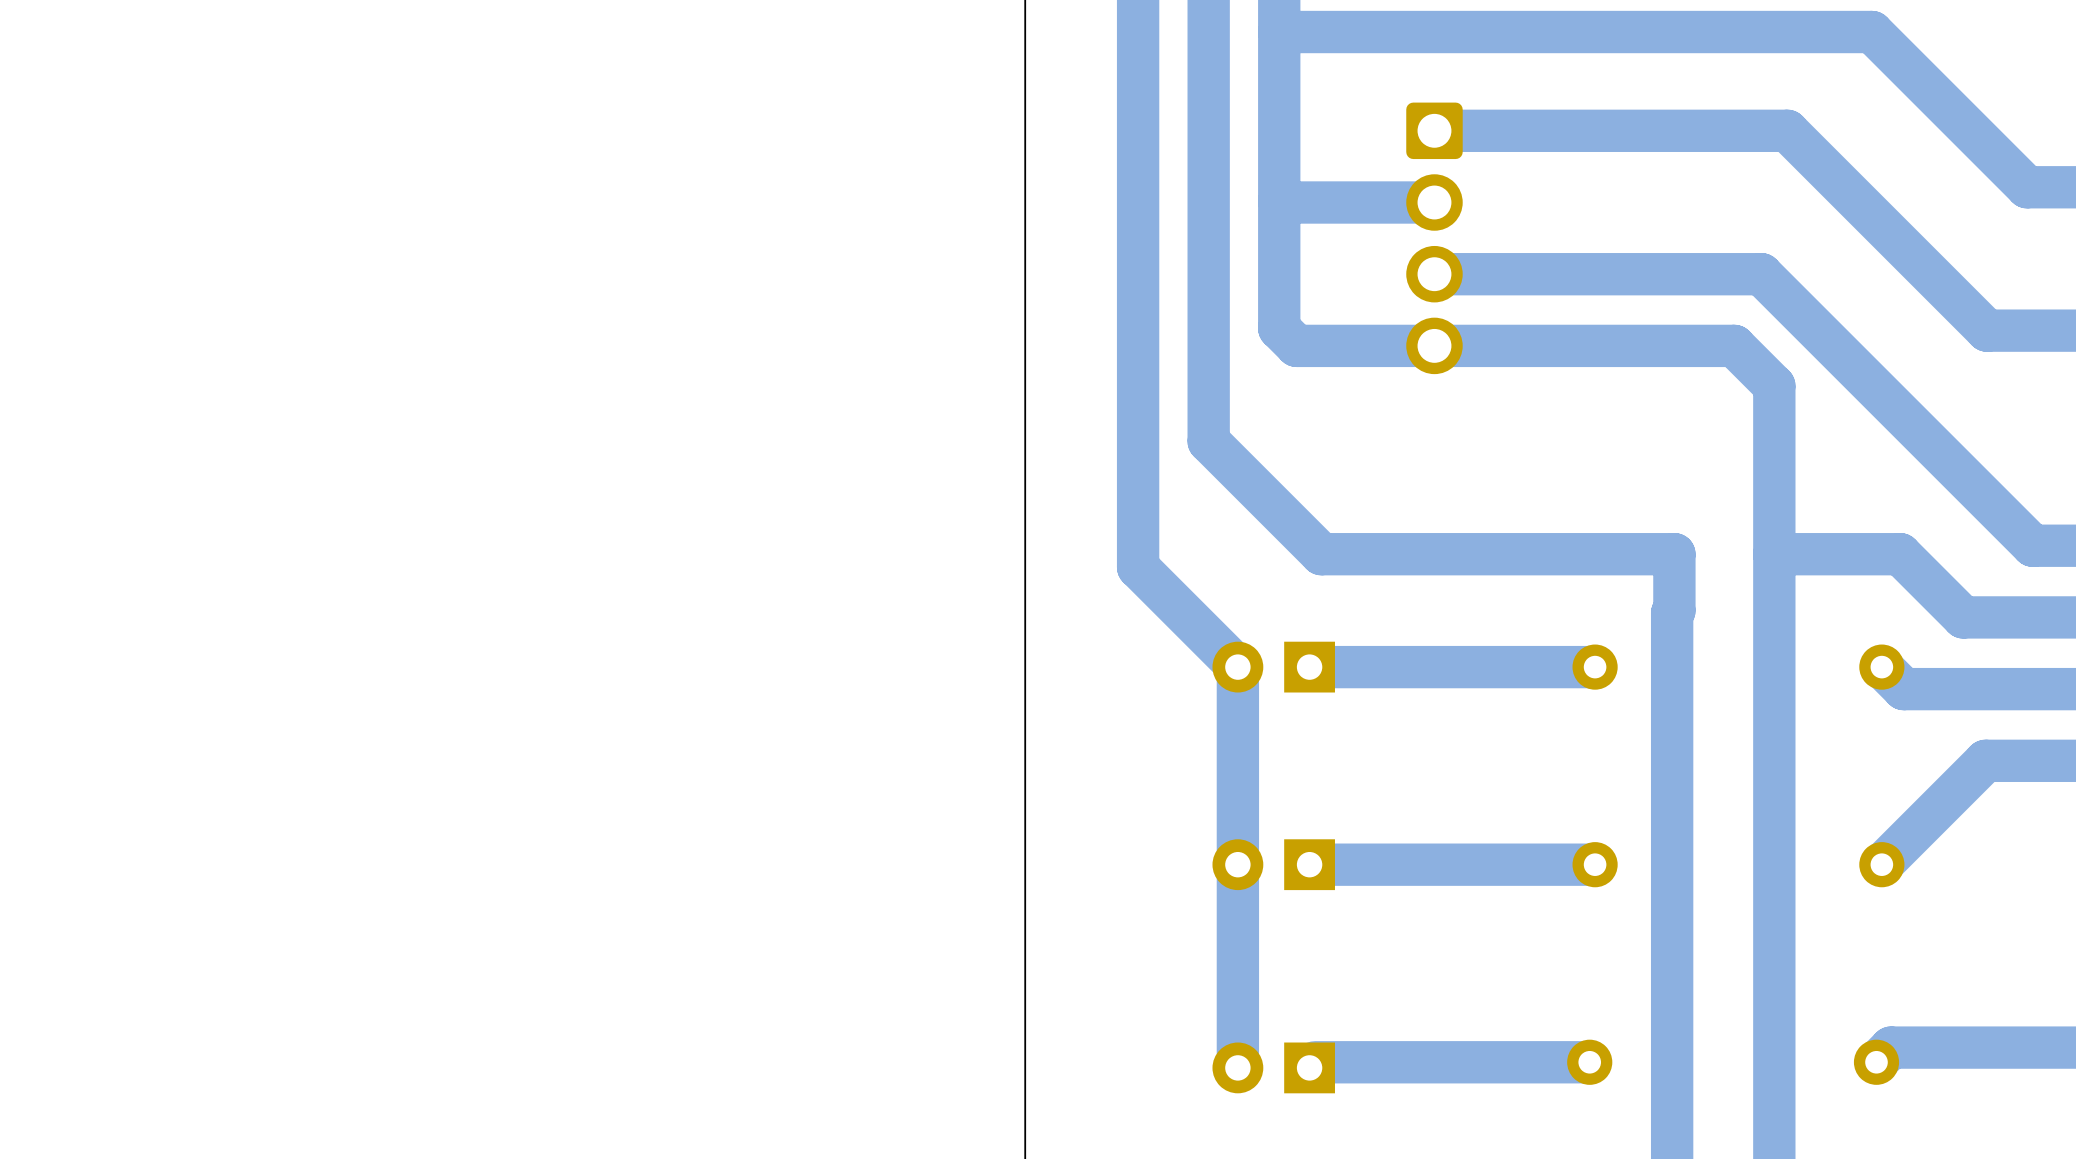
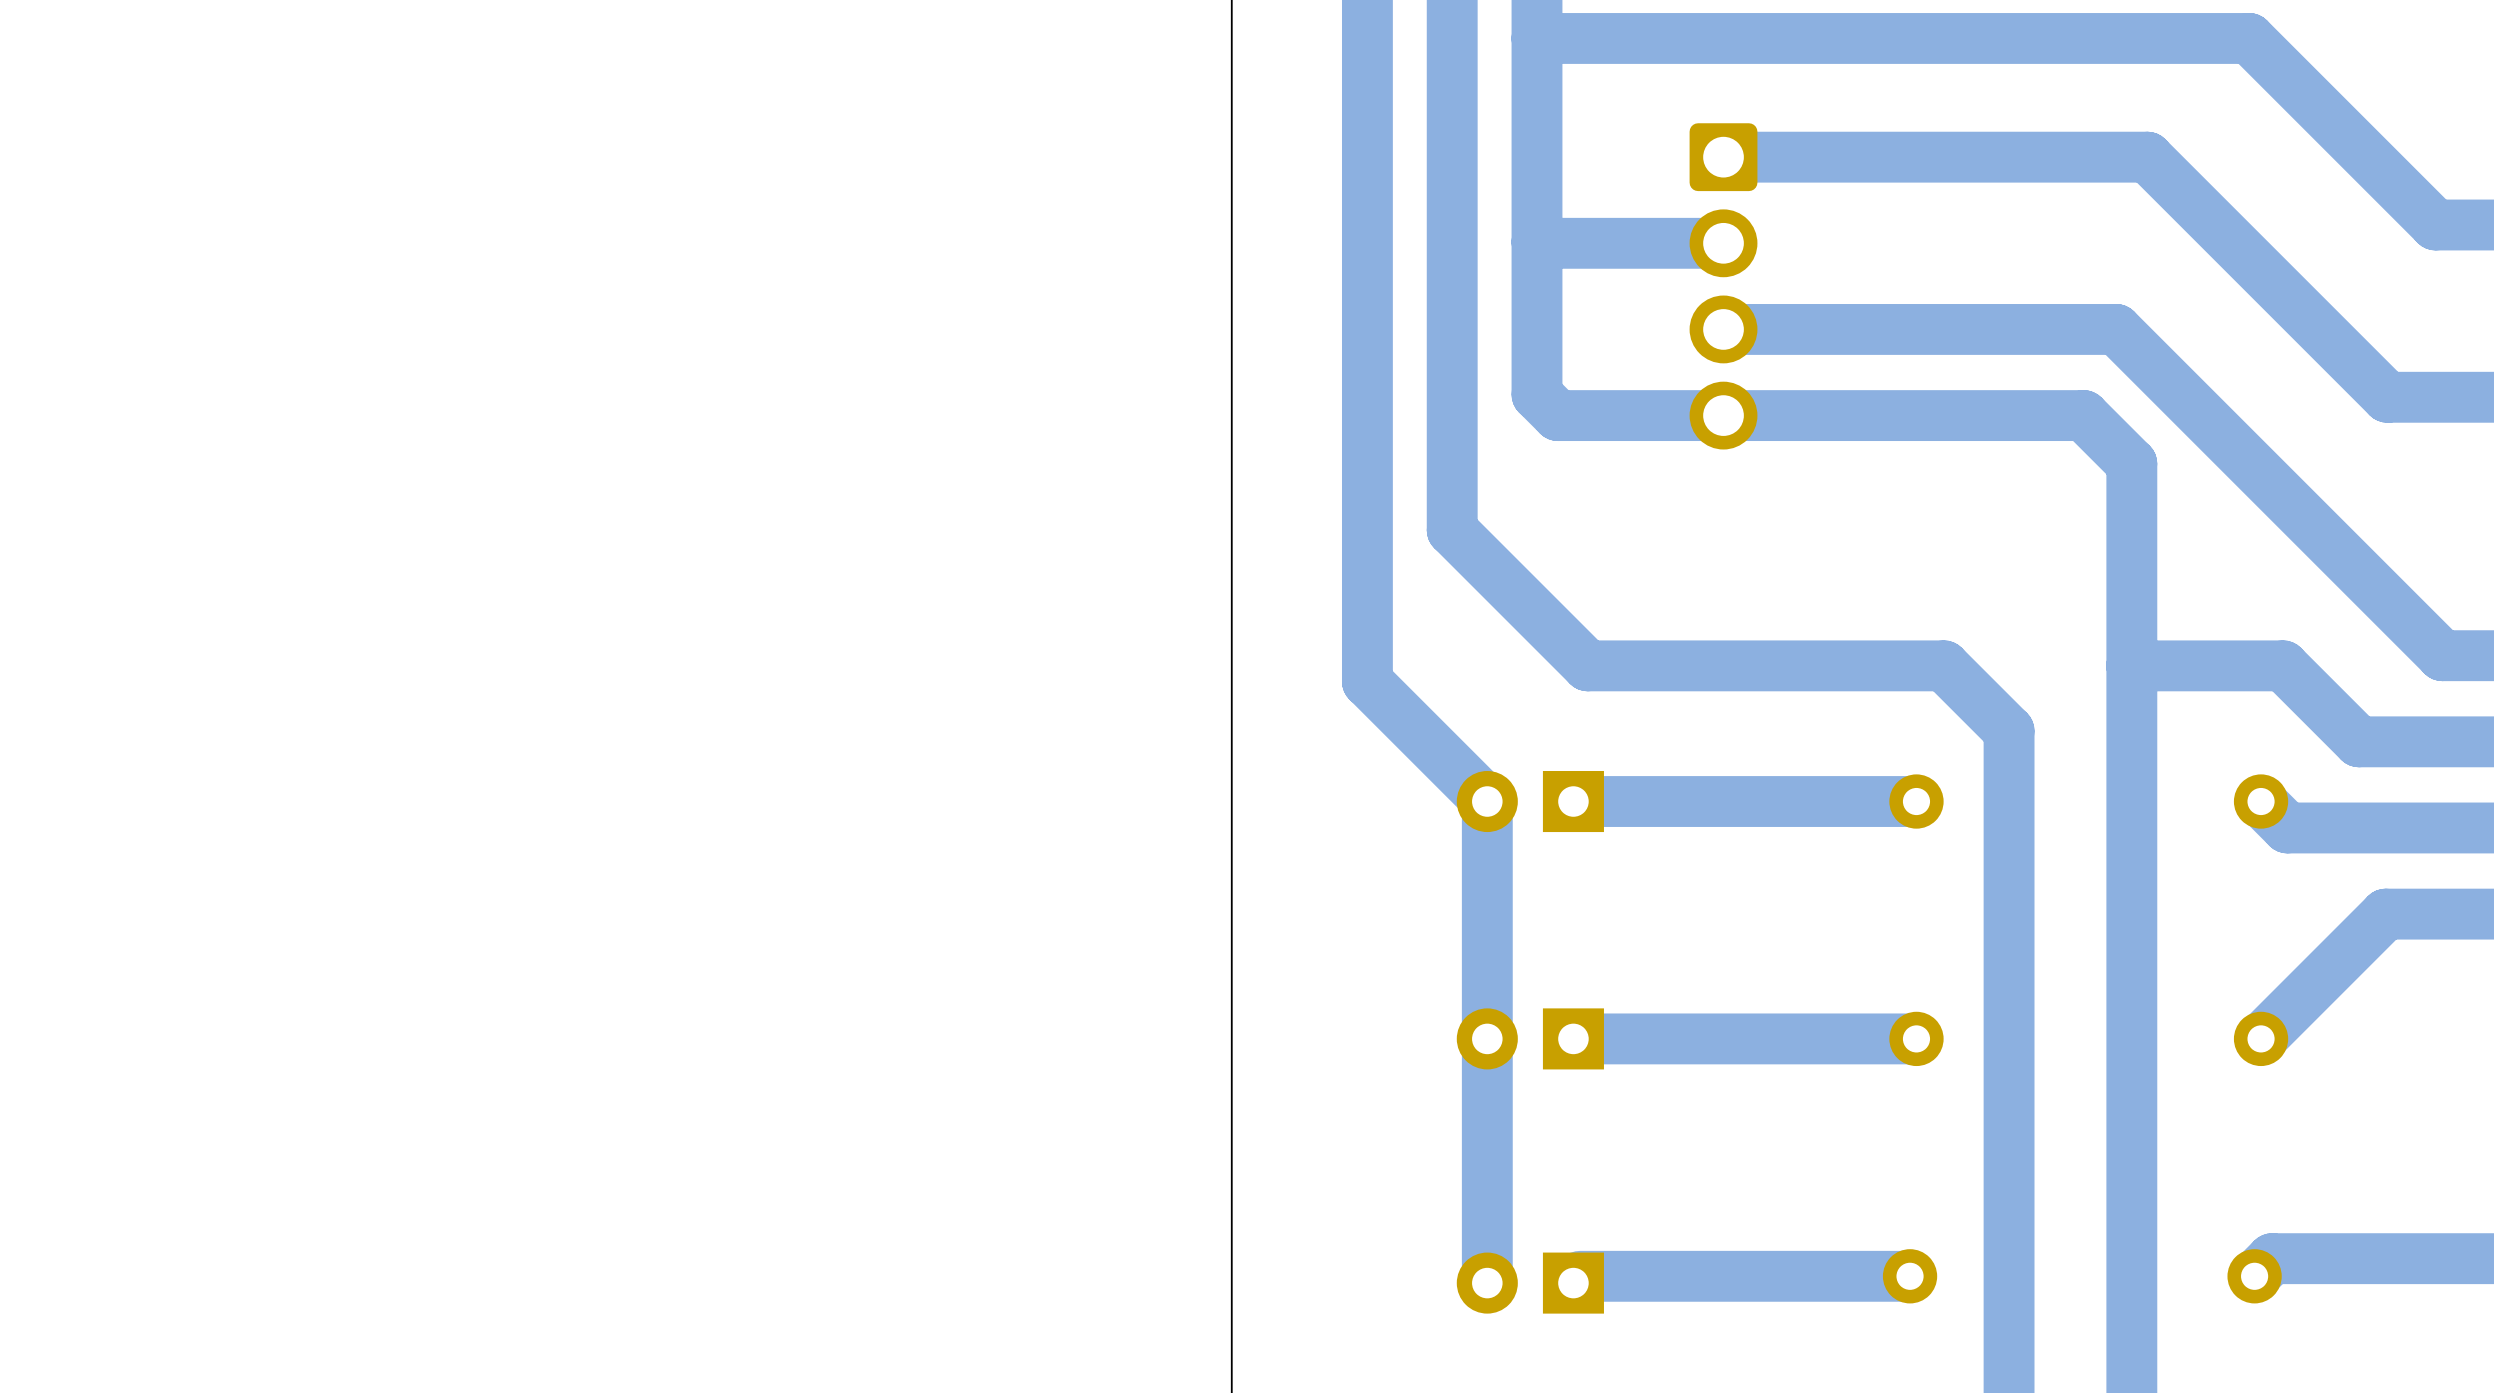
track: (1617, 554) (1674, 554) (1674, 610) (1672, 612) -> (1943, 665) (2009, 730) (2009, 736)

